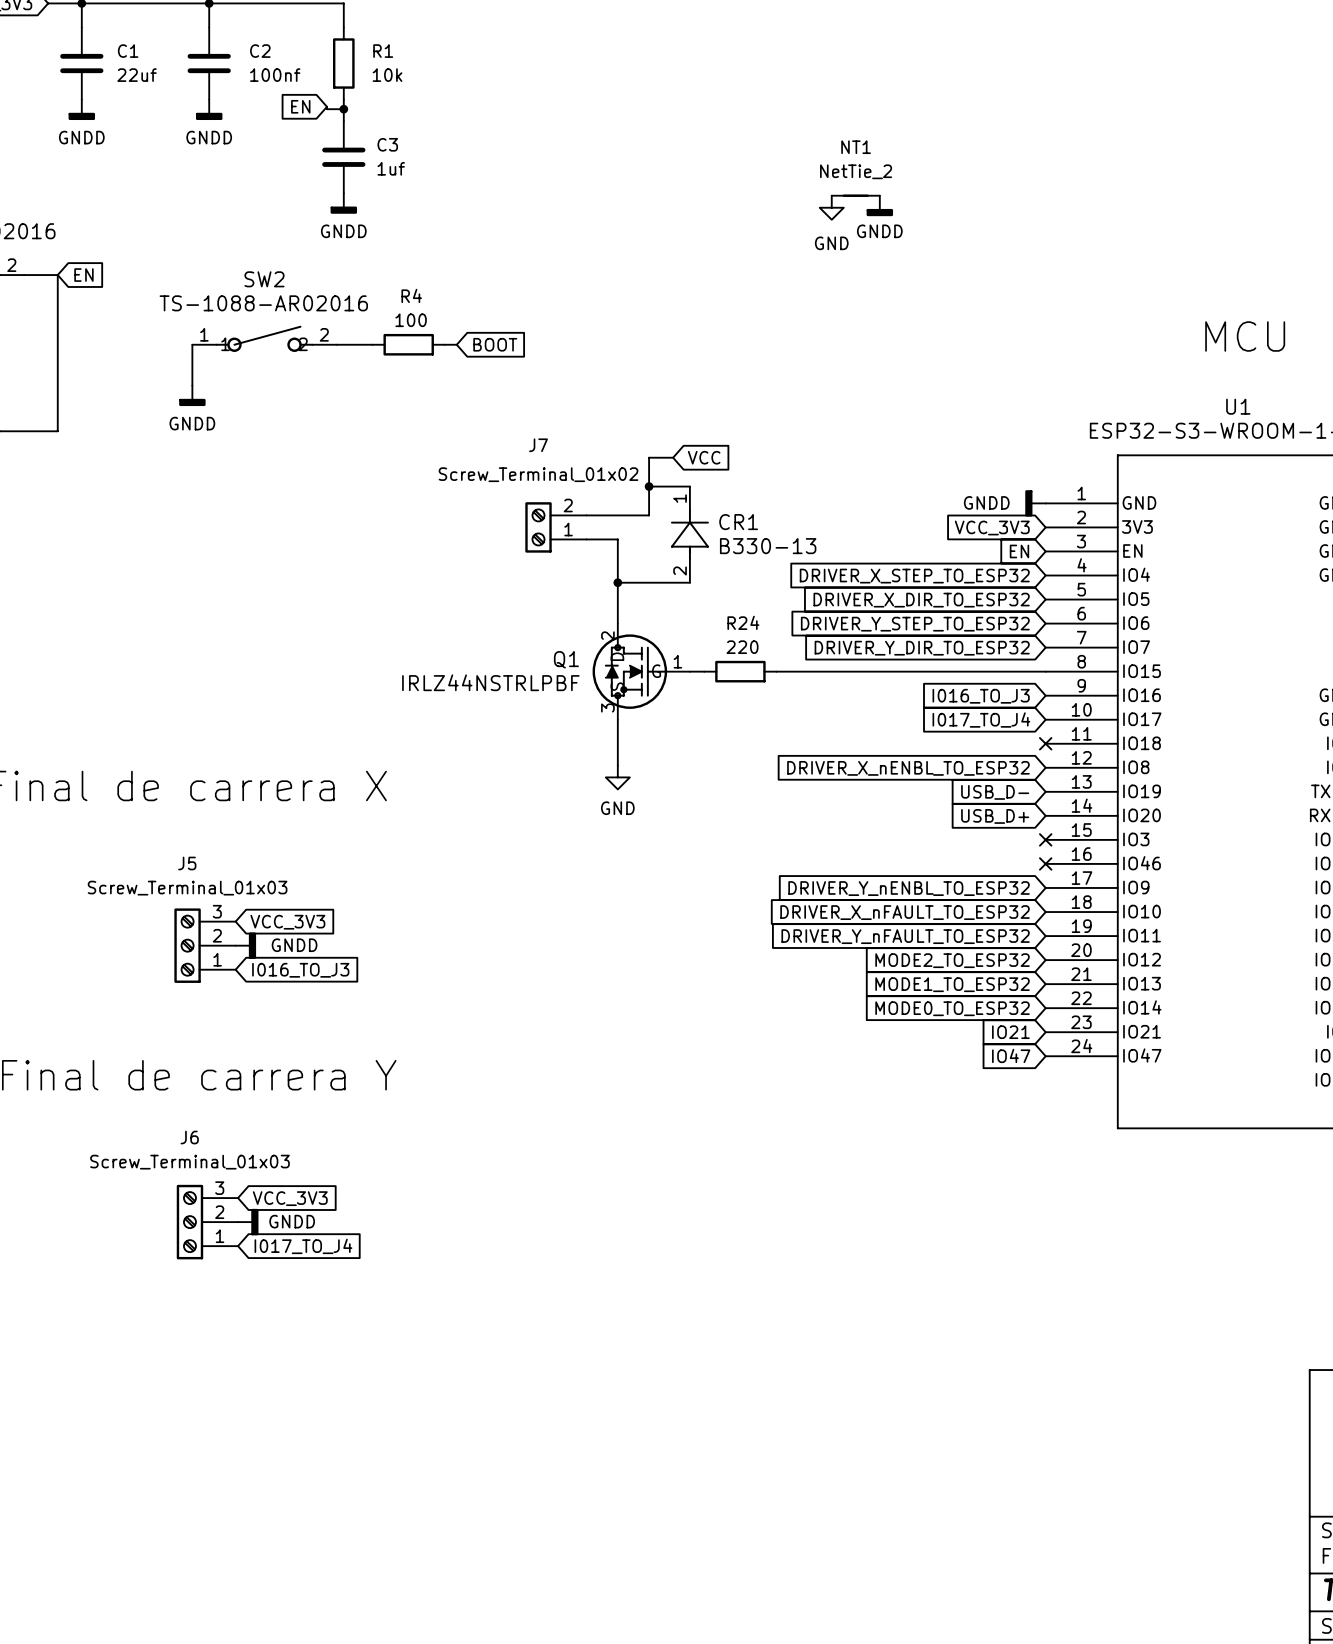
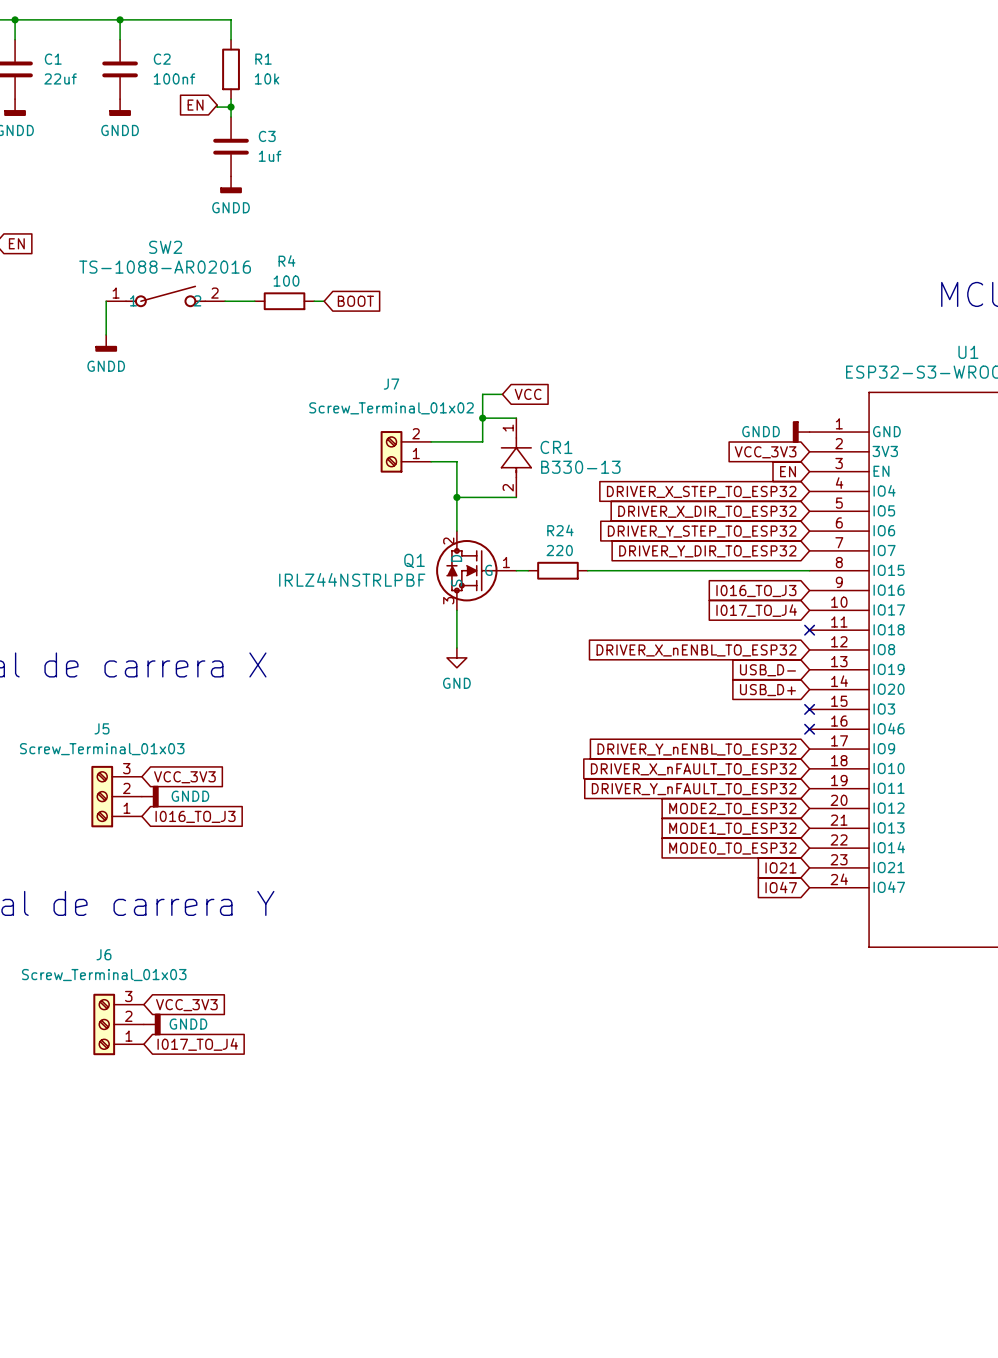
NT1: NetTie_2 (855, 195) -> none
power symbol: GNDD (879, 205) -> none
power symbol: GND (831, 207) -> none

